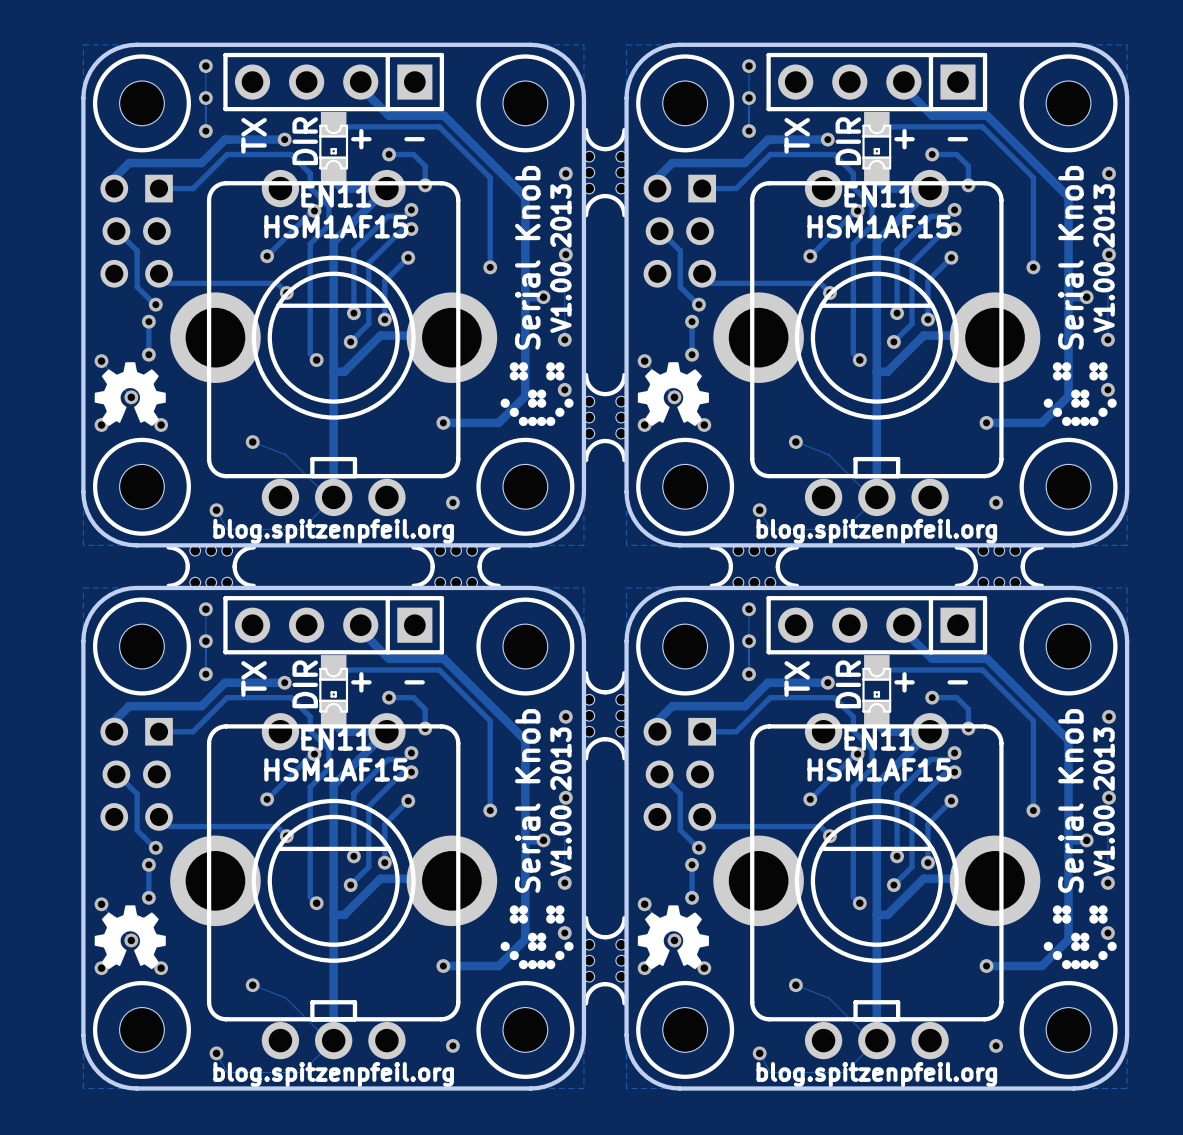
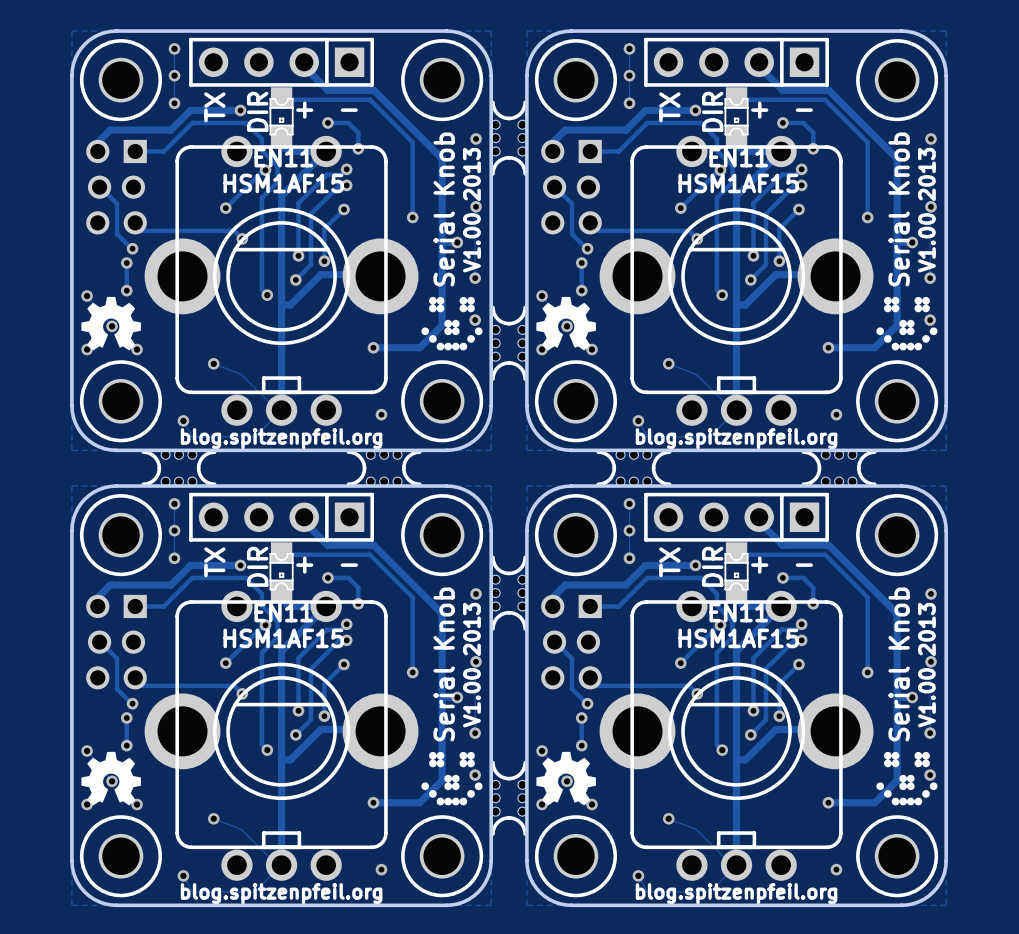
part footprint: [92, 54, 191, 153] -> [79, 39, 163, 122]
part footprint: [476, 54, 575, 153] -> [401, 39, 484, 122]
part footprint: [636, 54, 735, 153] -> [534, 39, 618, 122]
part footprint: [1019, 54, 1118, 153] -> [856, 39, 939, 122]
part footprint: [92, 437, 191, 536] -> [79, 360, 163, 443]
part footprint: [476, 437, 575, 536] -> [401, 360, 484, 443]
part footprint: [636, 437, 735, 536] -> [534, 360, 618, 443]
part footprint: [1019, 437, 1118, 536] -> [856, 360, 939, 443]
part footprint: [92, 597, 191, 696] -> [79, 494, 163, 577]
part footprint: [476, 597, 575, 696] -> [401, 494, 484, 577]
part footprint: [636, 597, 735, 696] -> [534, 494, 618, 577]
part footprint: [1019, 597, 1118, 696] -> [856, 494, 939, 577]
part footprint: [92, 980, 191, 1079] -> [79, 815, 163, 898]
part footprint: [476, 980, 575, 1079] -> [401, 815, 484, 898]
part footprint: [636, 980, 735, 1079] -> [534, 815, 618, 898]
part footprint: [1019, 980, 1118, 1079] -> [856, 815, 939, 898]

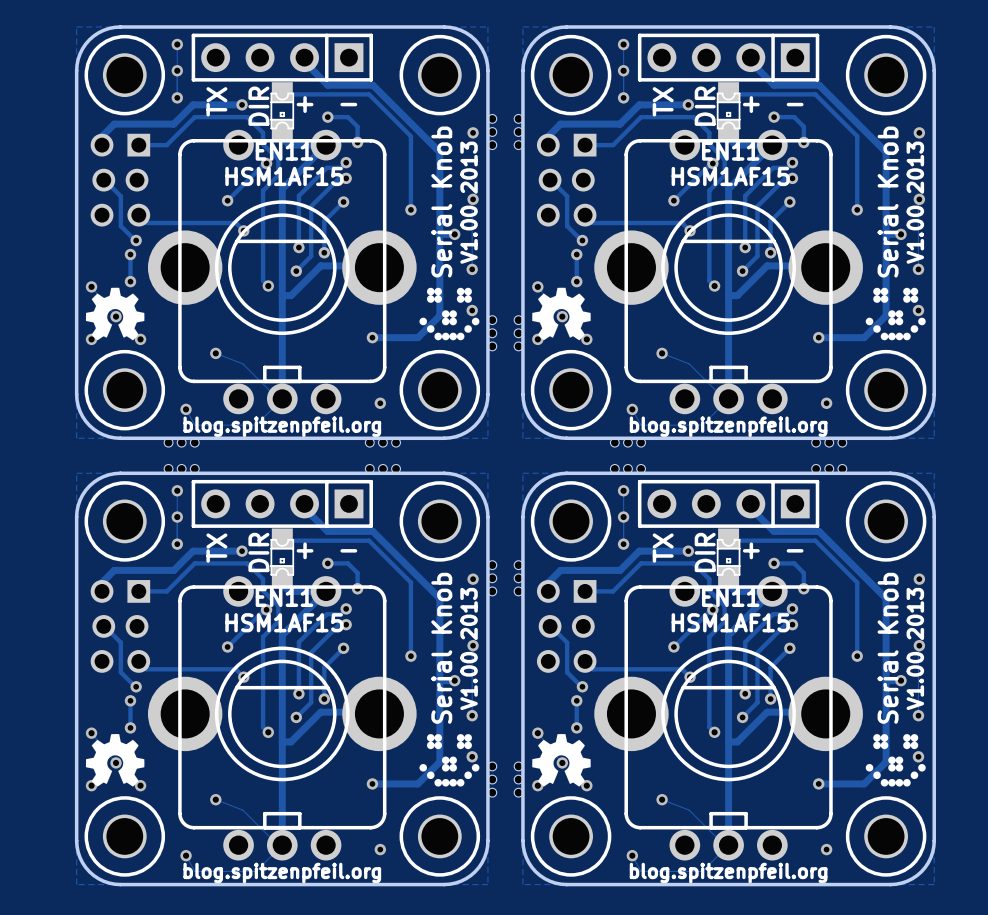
part footprint: [491, 100, 527, 176] -> [487, 114, 523, 150]
part footprint: [491, 305, 527, 381] -> [487, 315, 523, 351]
part footprint: [141, 450, 217, 487] -> [164, 438, 200, 474]
part footprint: [346, 450, 422, 487] -> [365, 438, 401, 474]
part footprint: [596, 450, 672, 487] -> [610, 438, 646, 474]
part footprint: [801, 450, 877, 487] -> [811, 438, 847, 474]
part footprint: [491, 555, 527, 631] -> [487, 560, 523, 596]
part footprint: [491, 760, 527, 836] -> [487, 762, 523, 798]

